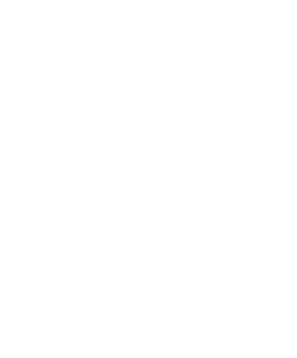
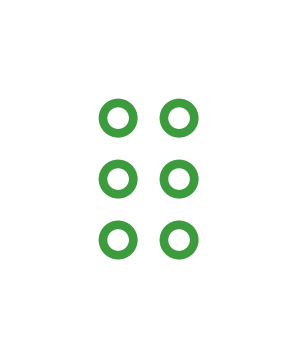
part: none -> (148, 179)

